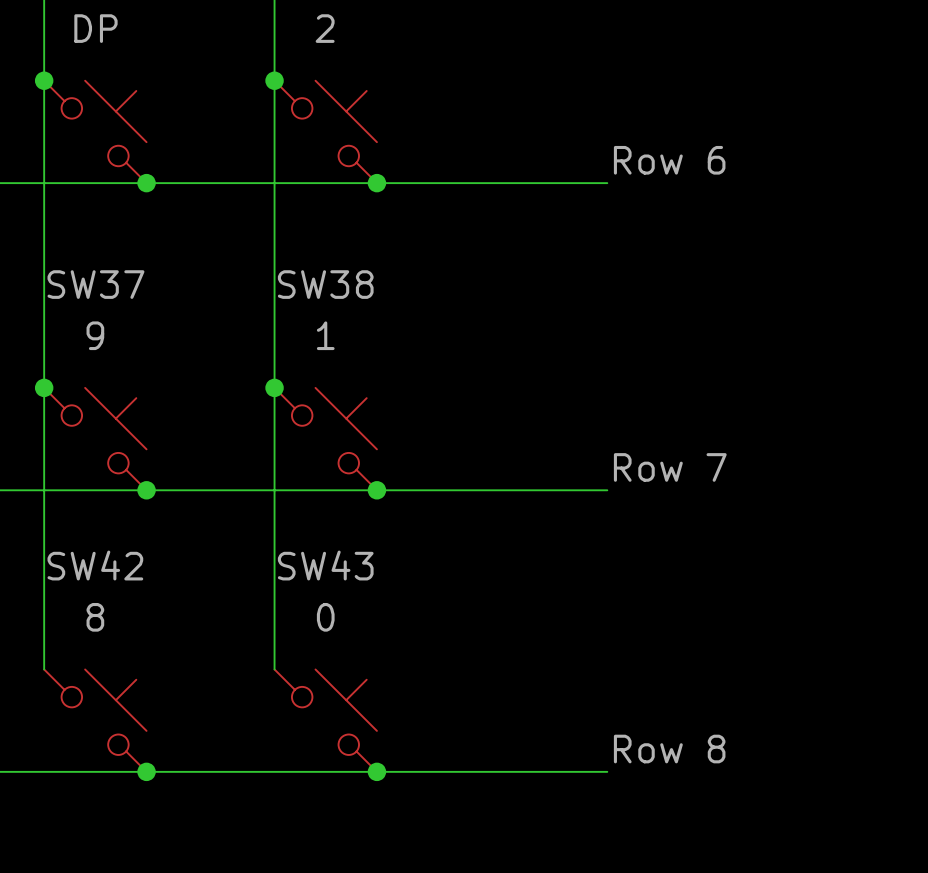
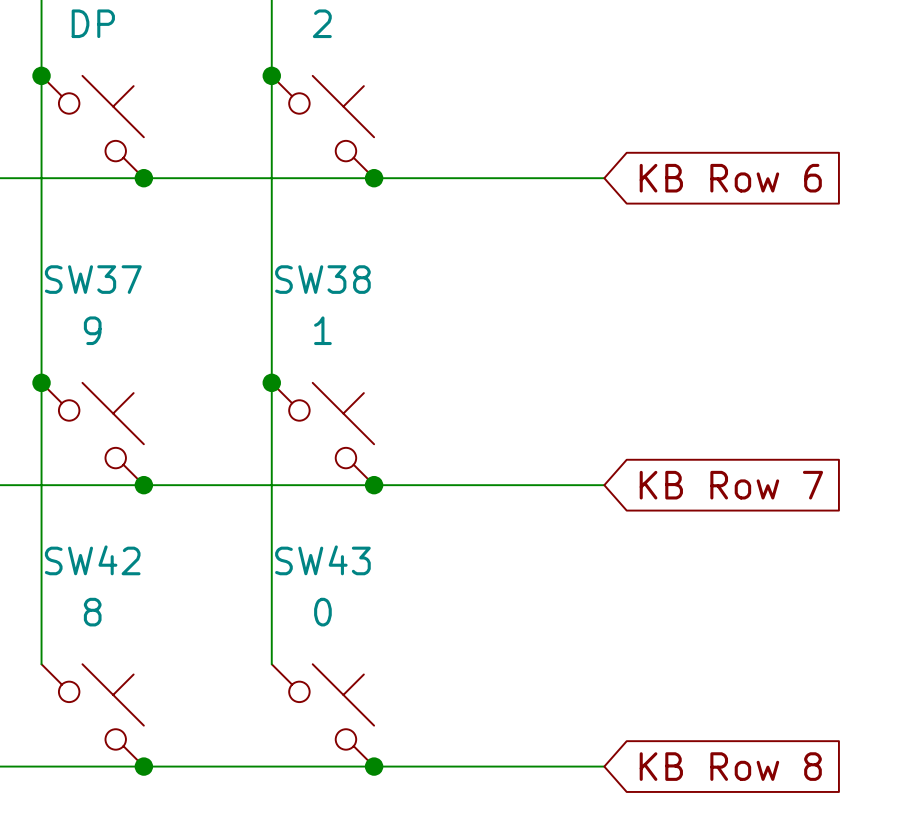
label: Row 6 (669, 160) -> none
global label: none -> KB Row 6 (730, 178)
label: Row 7 (670, 467) -> none
global label: none -> KB Row 7 (731, 485)
label: Row 8 (669, 749) -> none
global label: none -> KB Row 8 (730, 766)

